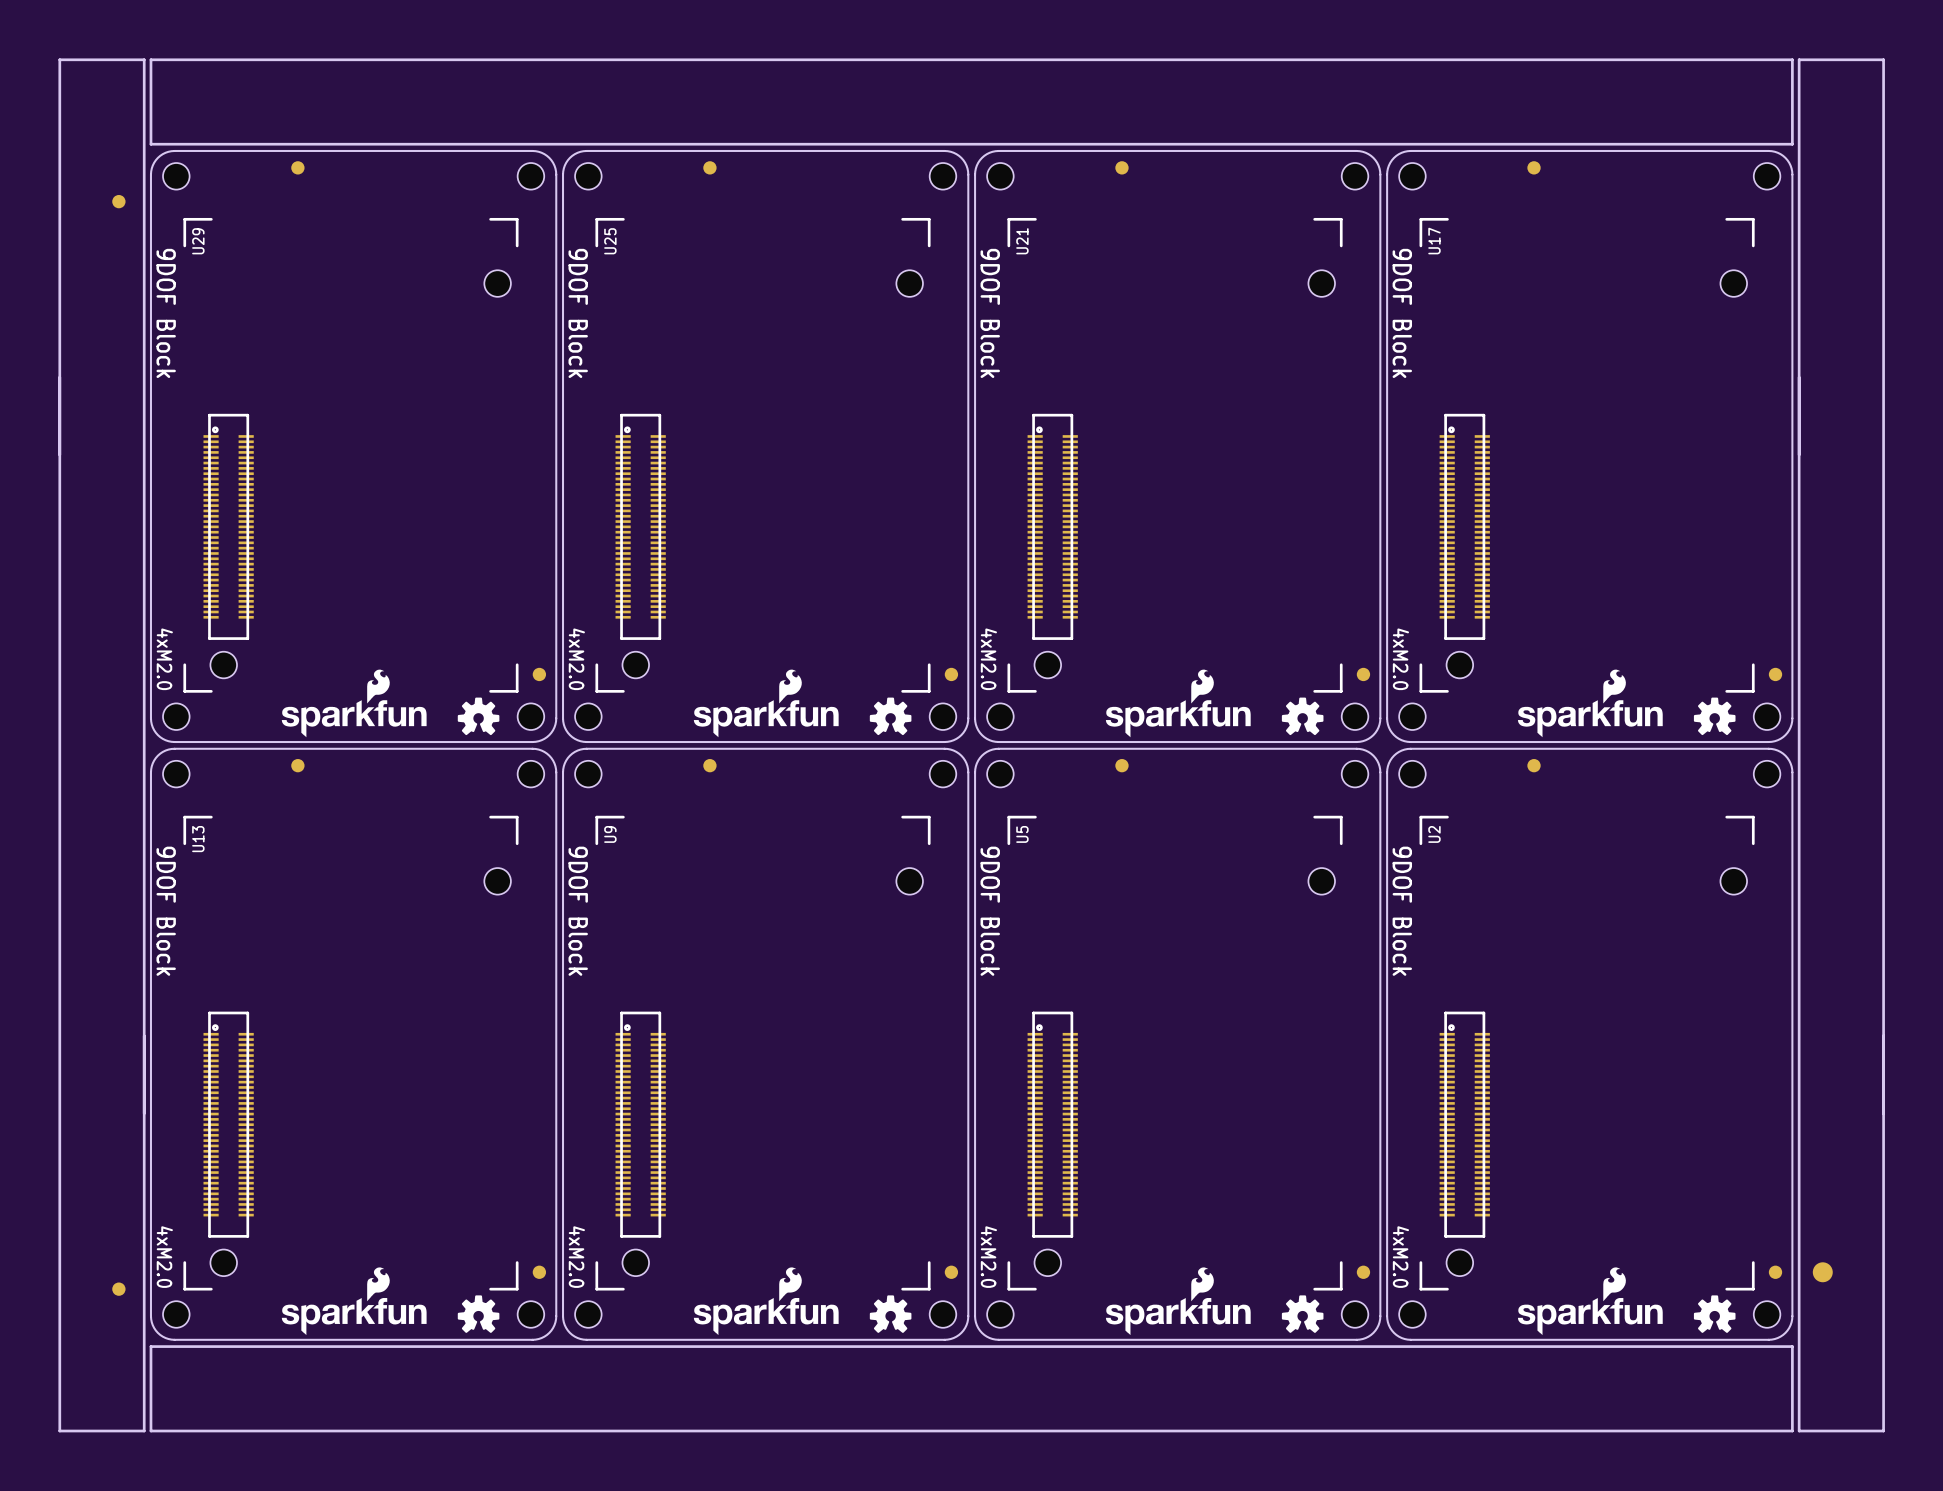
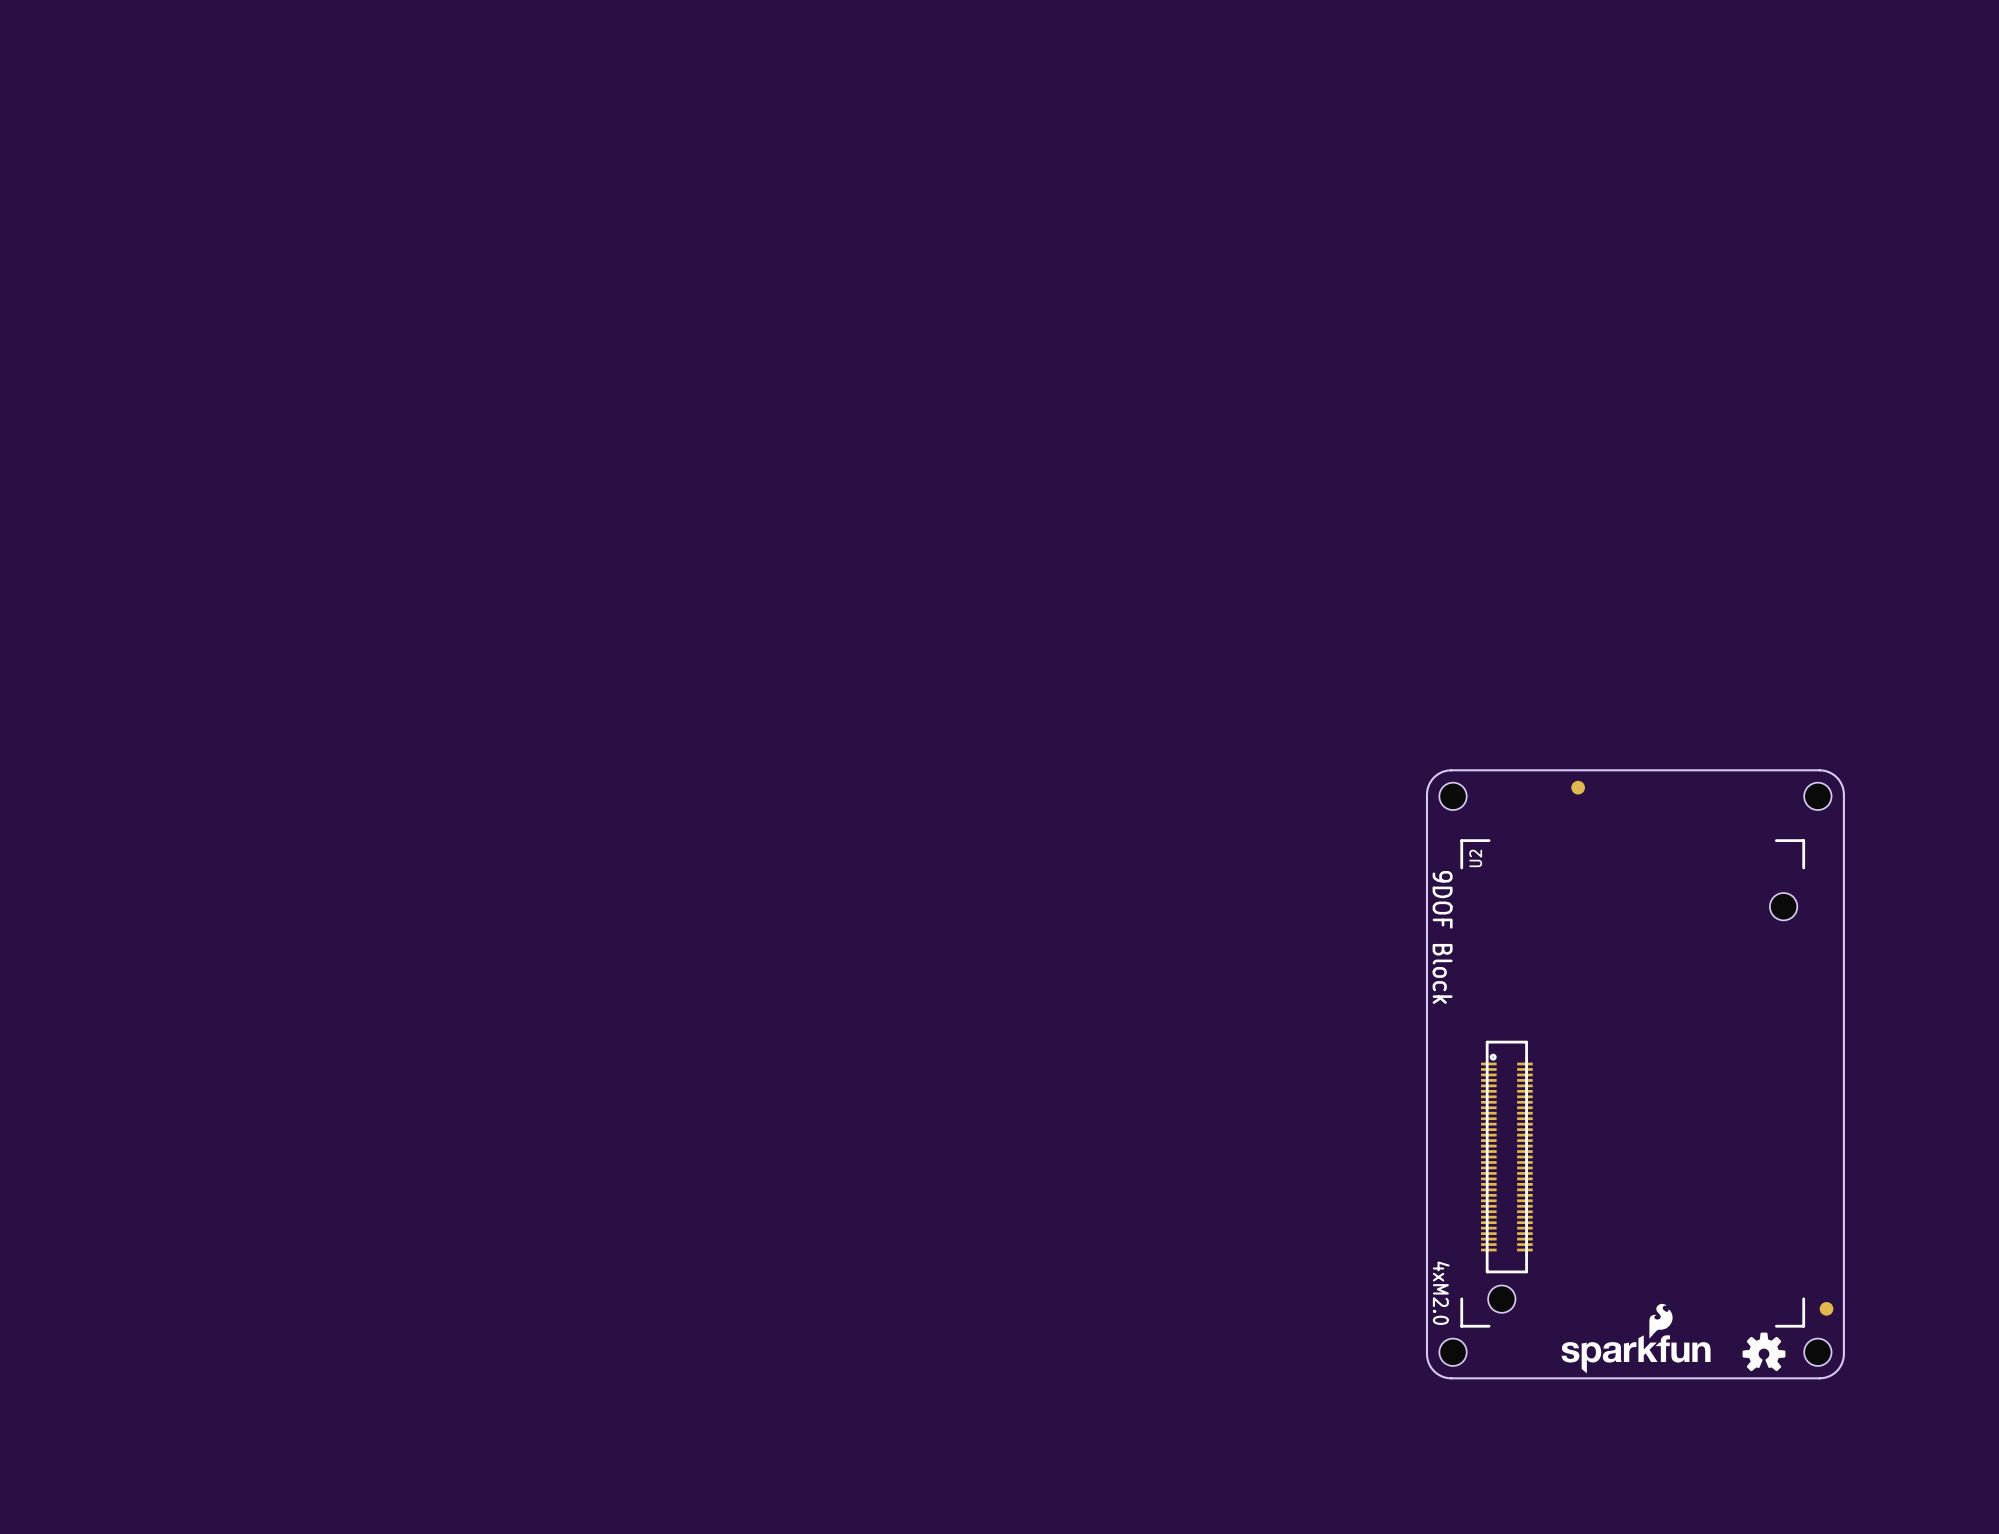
board edge: (144, 59) (144, 1431) (59, 1431) (59, 59) (144, 59) -> none
board edge: (1792, 59) (1792, 144) (150, 144) (150, 59) (1792, 59) -> none
board edge: (1883, 59) (1883, 1431) (1799, 1431) (1799, 59) (1883, 59) -> none
board edge: (532, 150) (174, 150) (162, 154) (154, 162) (150, 174) (150, 718) (154, 730) (162, 738) (174, 742) (532, 742) (544, 738) (553, 730) (556, 718) (556, 174) (554, 165) (549, 157) (541, 152) (532, 150) -> none
board edge: (944, 150) (586, 150) (574, 154) (566, 162) (563, 174) (563, 718) (566, 730) (574, 738) (586, 742) (944, 742) (956, 738) (965, 730) (968, 718) (968, 174) (966, 165) (961, 157) (953, 152) (944, 150) -> none
board edge: (1356, 150) (998, 150) (986, 154) (978, 162) (975, 174) (975, 718) (978, 730) (986, 738) (998, 742) (1356, 742) (1368, 738) (1377, 730) (1380, 718) (1380, 174) (1378, 165) (1373, 157) (1365, 152) (1356, 150) -> none
board edge: (1768, 150) (1410, 150) (1398, 154) (1390, 162) (1387, 174) (1387, 718) (1390, 730) (1398, 738) (1410, 742) (1768, 742) (1780, 738) (1789, 730) (1792, 718) (1792, 174) (1790, 165) (1785, 157) (1777, 152) (1768, 150) -> none
part: (297, 167) -> none
part: (709, 167) -> none
part: (1121, 167) -> none
part: (1534, 167) -> none
hole: (176, 176) -> none
hole: (530, 176) -> none
hole: (588, 176) -> none
hole: (942, 176) -> none
hole: (1000, 176) -> none
hole: (1355, 176) -> none
hole: (1412, 176) -> none
hole: (1767, 176) -> none
part: (118, 201) -> none
text: 9DOF Block (166, 313) -> none
text: 9DOF Block (578, 313) -> none
text: 9DOF Block (990, 313) -> none
text: 9DOF Block (1402, 313) -> none
U29: (350, 455) -> none
U25: (763, 455) -> none
U21: (1175, 455) -> none
U17: (1587, 455) -> none
text: 4xM2.0 (164, 659) -> none
text: 4xM2.0 (576, 659) -> none
text: 4xM2.0 (988, 659) -> none
text: 4xM2.0 (1400, 659) -> none
drawing: [281, 669, 427, 738] -> none
drawing: [693, 669, 839, 738] -> none
drawing: [1105, 669, 1251, 738] -> none
drawing: [1517, 669, 1663, 738] -> none
part: (539, 674) -> none
part: (951, 674) -> none
part: (1363, 674) -> none
part: (1775, 674) -> none
drawing: [457, 697, 500, 736] -> none
drawing: [869, 697, 912, 736] -> none
drawing: [1281, 697, 1324, 736] -> none
drawing: [1693, 697, 1736, 736] -> none
hole: (176, 716) -> none
hole: (530, 716) -> none
hole: (588, 716) -> none
hole: (942, 716) -> none
hole: (1000, 716) -> none
hole: (1355, 716) -> none
hole: (1412, 716) -> none
hole: (1767, 716) -> none
board edge: (532, 748) (174, 748) (162, 751) (154, 760) (150, 772) (150, 1316) (154, 1328) (162, 1336) (174, 1339) (532, 1339) (544, 1336) (553, 1328) (556, 1316) (556, 772) (554, 763) (549, 755) (541, 750) (532, 748) -> none
board edge: (944, 748) (586, 748) (574, 751) (566, 760) (563, 772) (563, 1316) (566, 1328) (574, 1336) (586, 1339) (944, 1339) (956, 1336) (965, 1328) (968, 1316) (968, 772) (966, 763) (961, 755) (953, 750) (944, 748) -> none
board edge: (1356, 748) (998, 748) (986, 751) (978, 760) (975, 772) (975, 1316) (978, 1328) (986, 1336) (998, 1339) (1356, 1339) (1368, 1336) (1377, 1328) (1380, 1316) (1380, 772) (1378, 763) (1373, 755) (1365, 750) (1356, 748) -> none
part: (297, 765) -> none
part: (709, 765) -> none
part: (1121, 765) -> none
hole: (176, 774) -> none
hole: (530, 774) -> none
hole: (588, 774) -> none
hole: (942, 774) -> none
hole: (1000, 774) -> none
hole: (1355, 774) -> none
text: 9DOF Block (166, 911) -> none
text: 9DOF Block (578, 911) -> none
text: 9DOF Block (990, 911) -> none
U13: (350, 1053) -> none
U9: (763, 1053) -> none
U5: (1175, 1053) -> none
text: 4xM2.0 (164, 1257) -> none
text: 4xM2.0 (576, 1257) -> none
text: 4xM2.0 (988, 1257) -> none
drawing: [281, 1267, 427, 1336] -> none
drawing: [693, 1267, 839, 1336] -> none
drawing: [1105, 1267, 1251, 1336] -> none
part: (539, 1272) -> none
part: (951, 1272) -> none
part: (1363, 1272) -> none
part: (1822, 1272) -> none
part: (118, 1289) -> none
drawing: [457, 1295, 500, 1333] -> none
drawing: [869, 1295, 912, 1333] -> none
drawing: [1281, 1295, 1324, 1333] -> none
hole: (176, 1314) -> none
hole: (530, 1314) -> none
hole: (588, 1314) -> none
hole: (942, 1314) -> none
hole: (1000, 1314) -> none
hole: (1355, 1314) -> none
board edge: (1792, 1346) (1792, 1431) (150, 1431) (150, 1346) (1792, 1346) -> none

